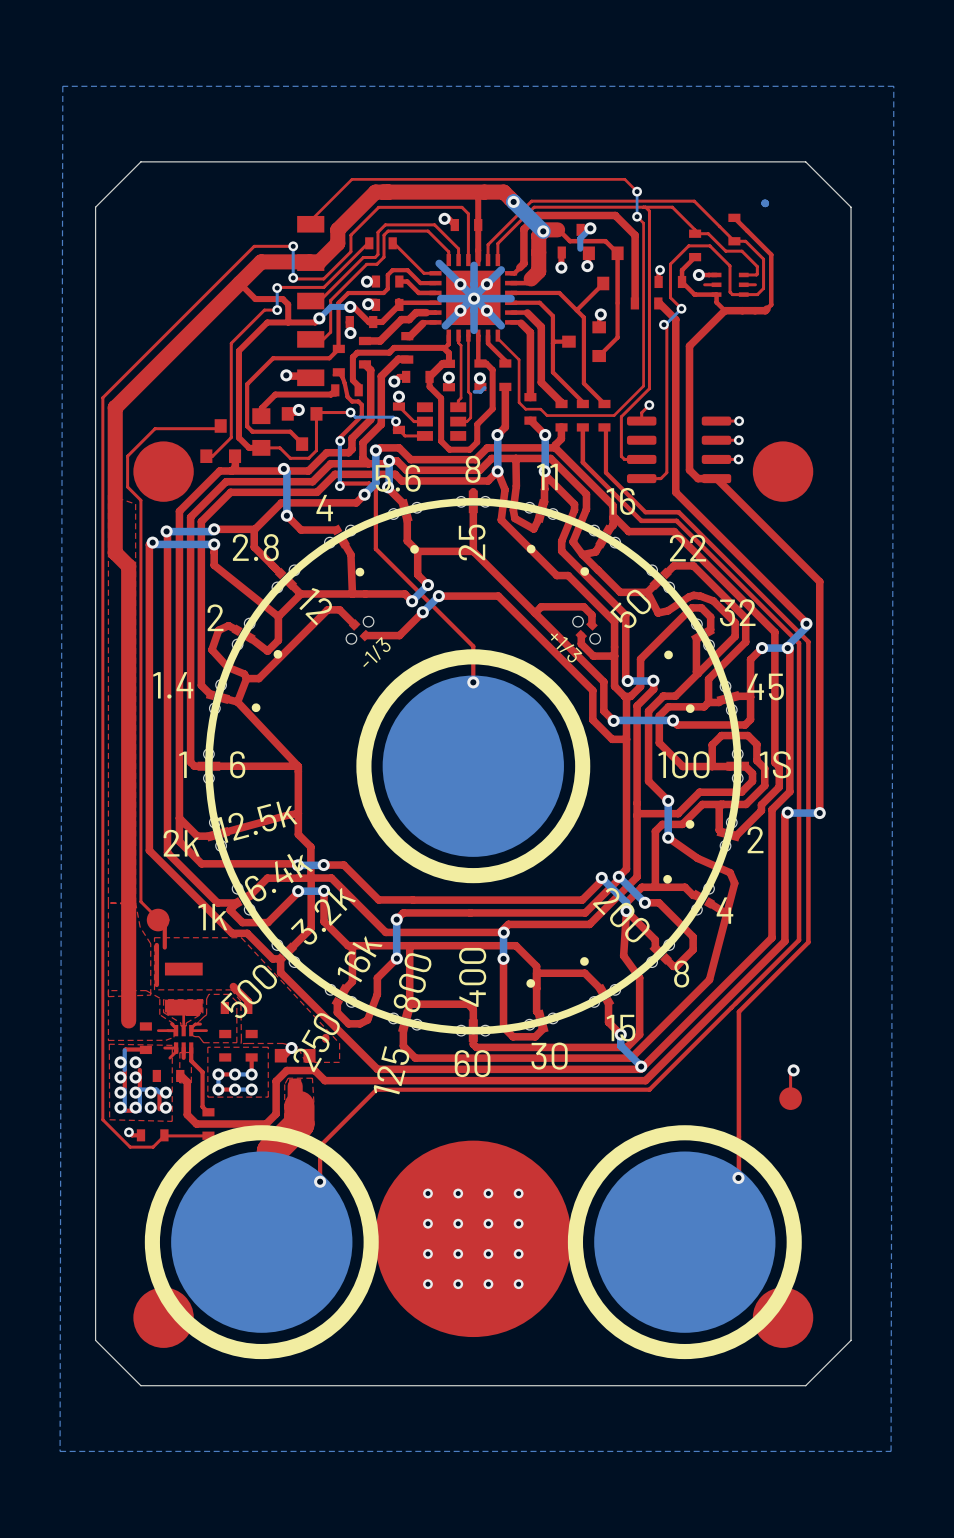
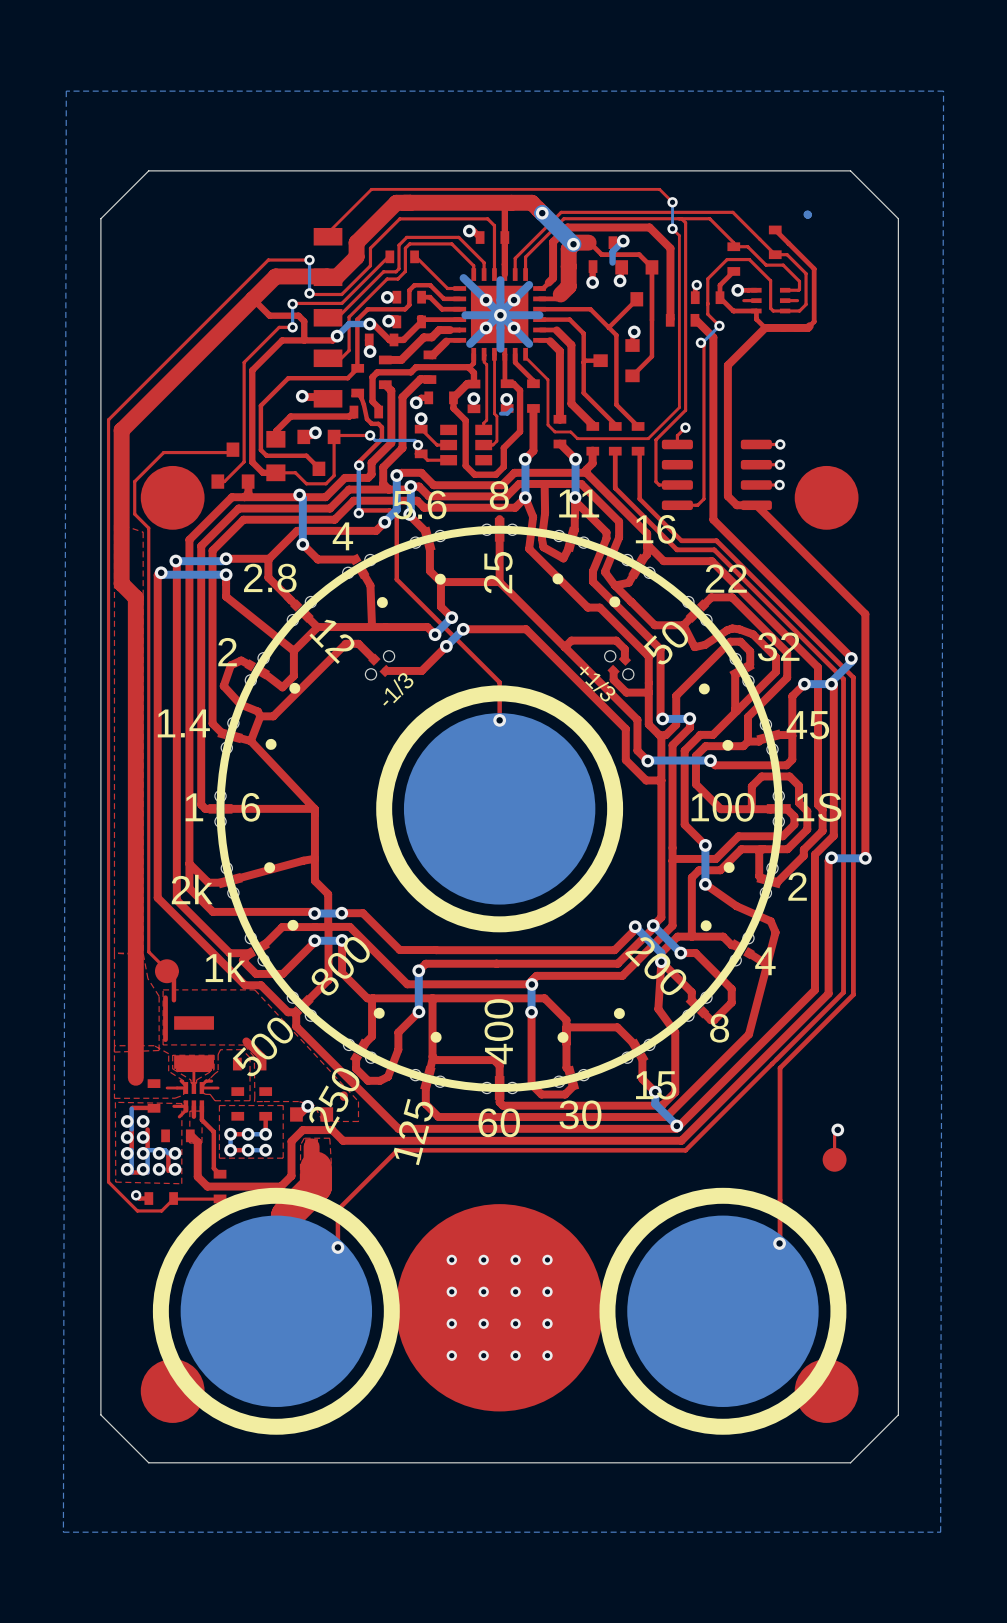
text: 12.5k (256, 822) -> • (269, 867)
text: 6.4k (278, 877) -> • (292, 925)
text: 3.2k (323, 916) -> 800 (340, 965)
text: 16k (360, 959) -> • (379, 1013)
text: 800 (412, 982) -> • (436, 1037)

